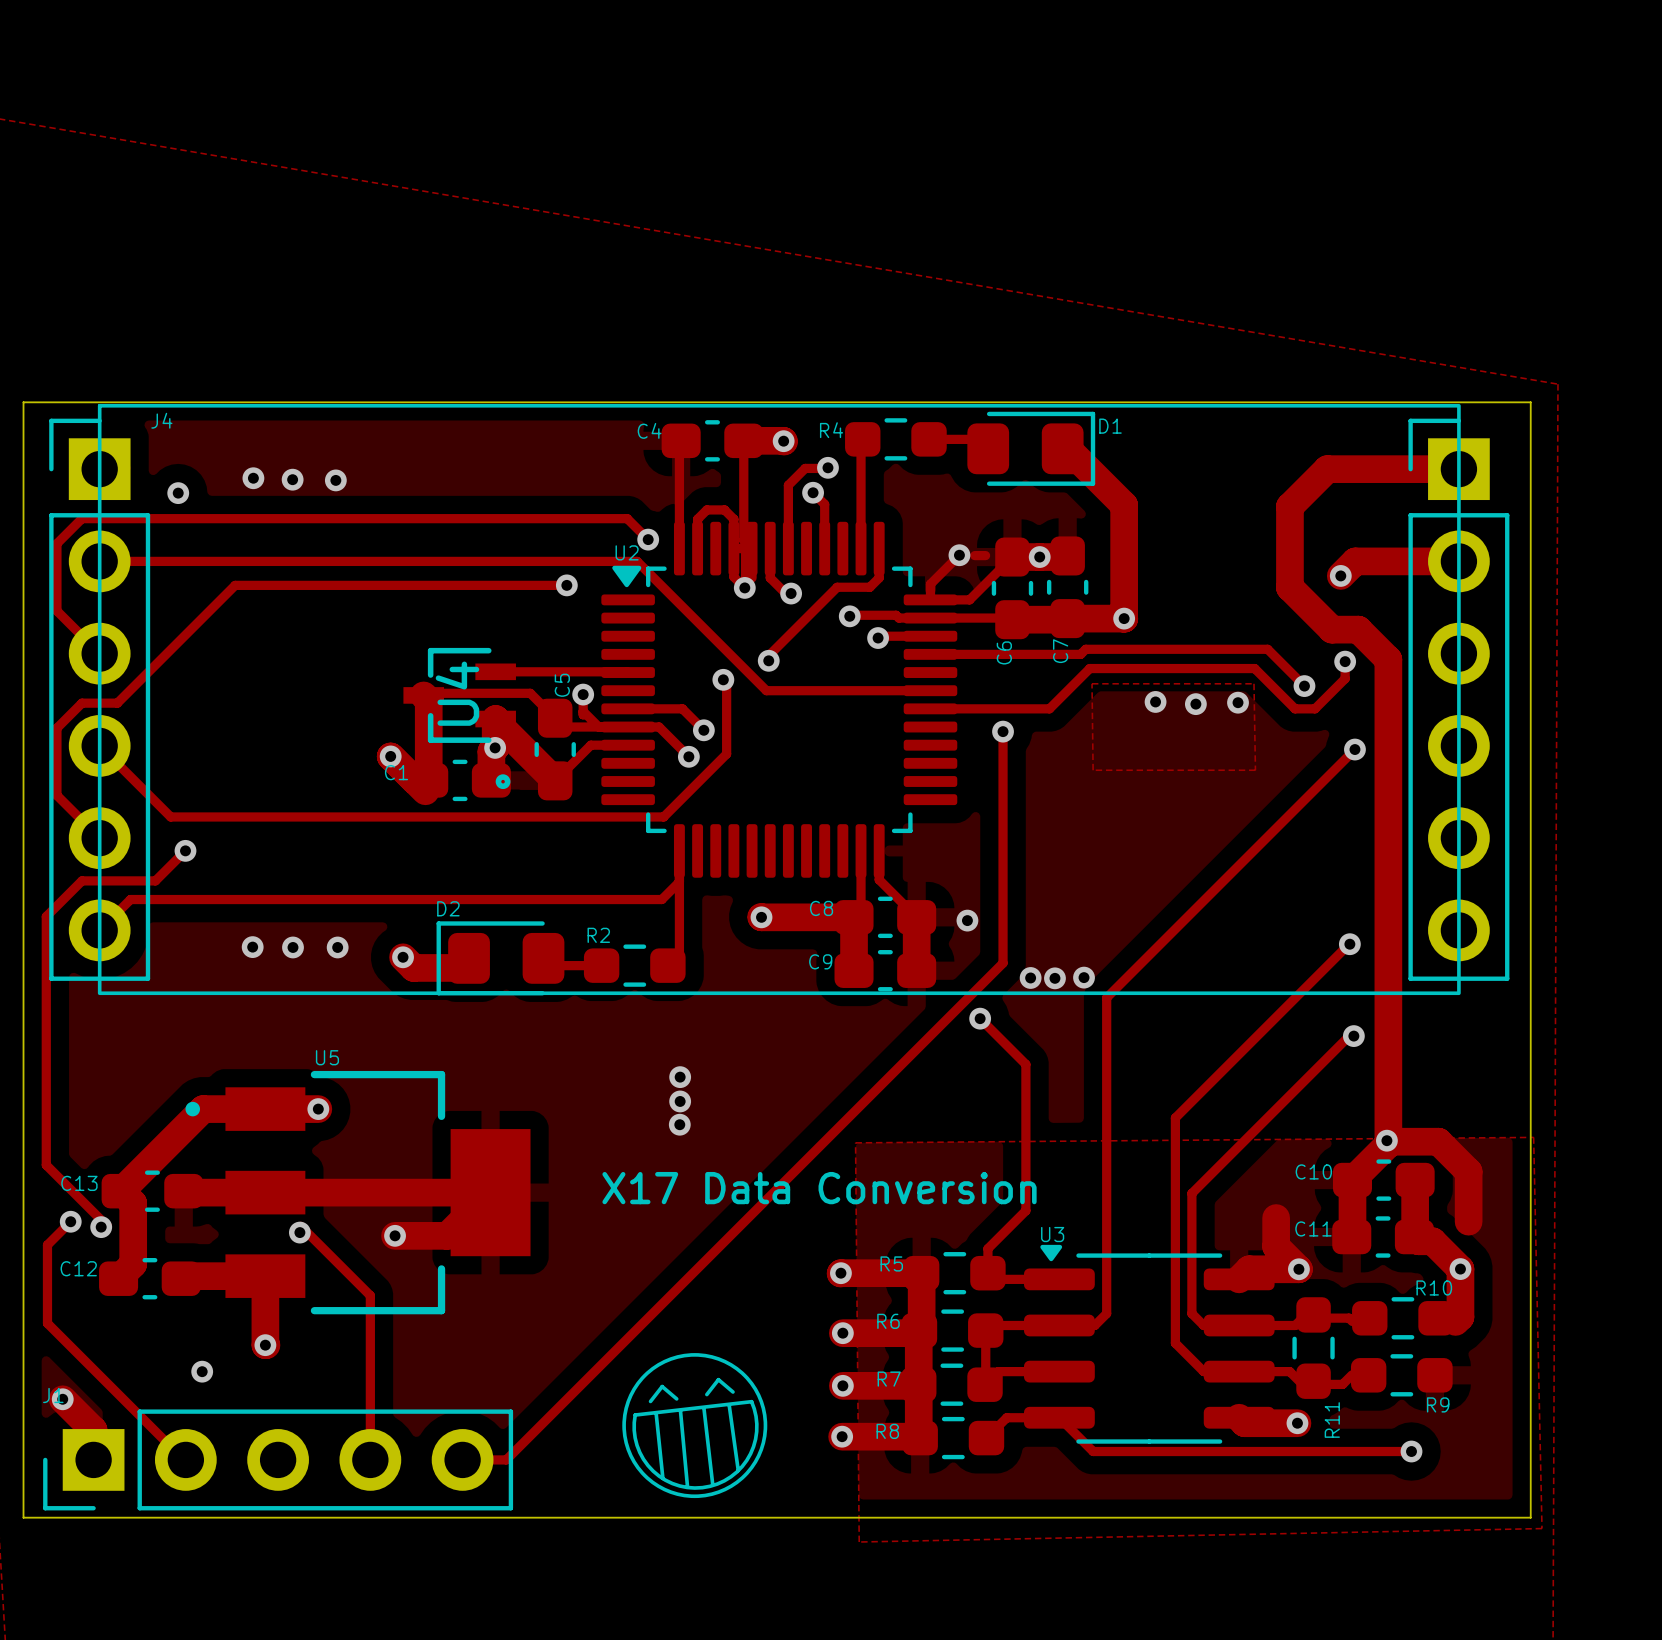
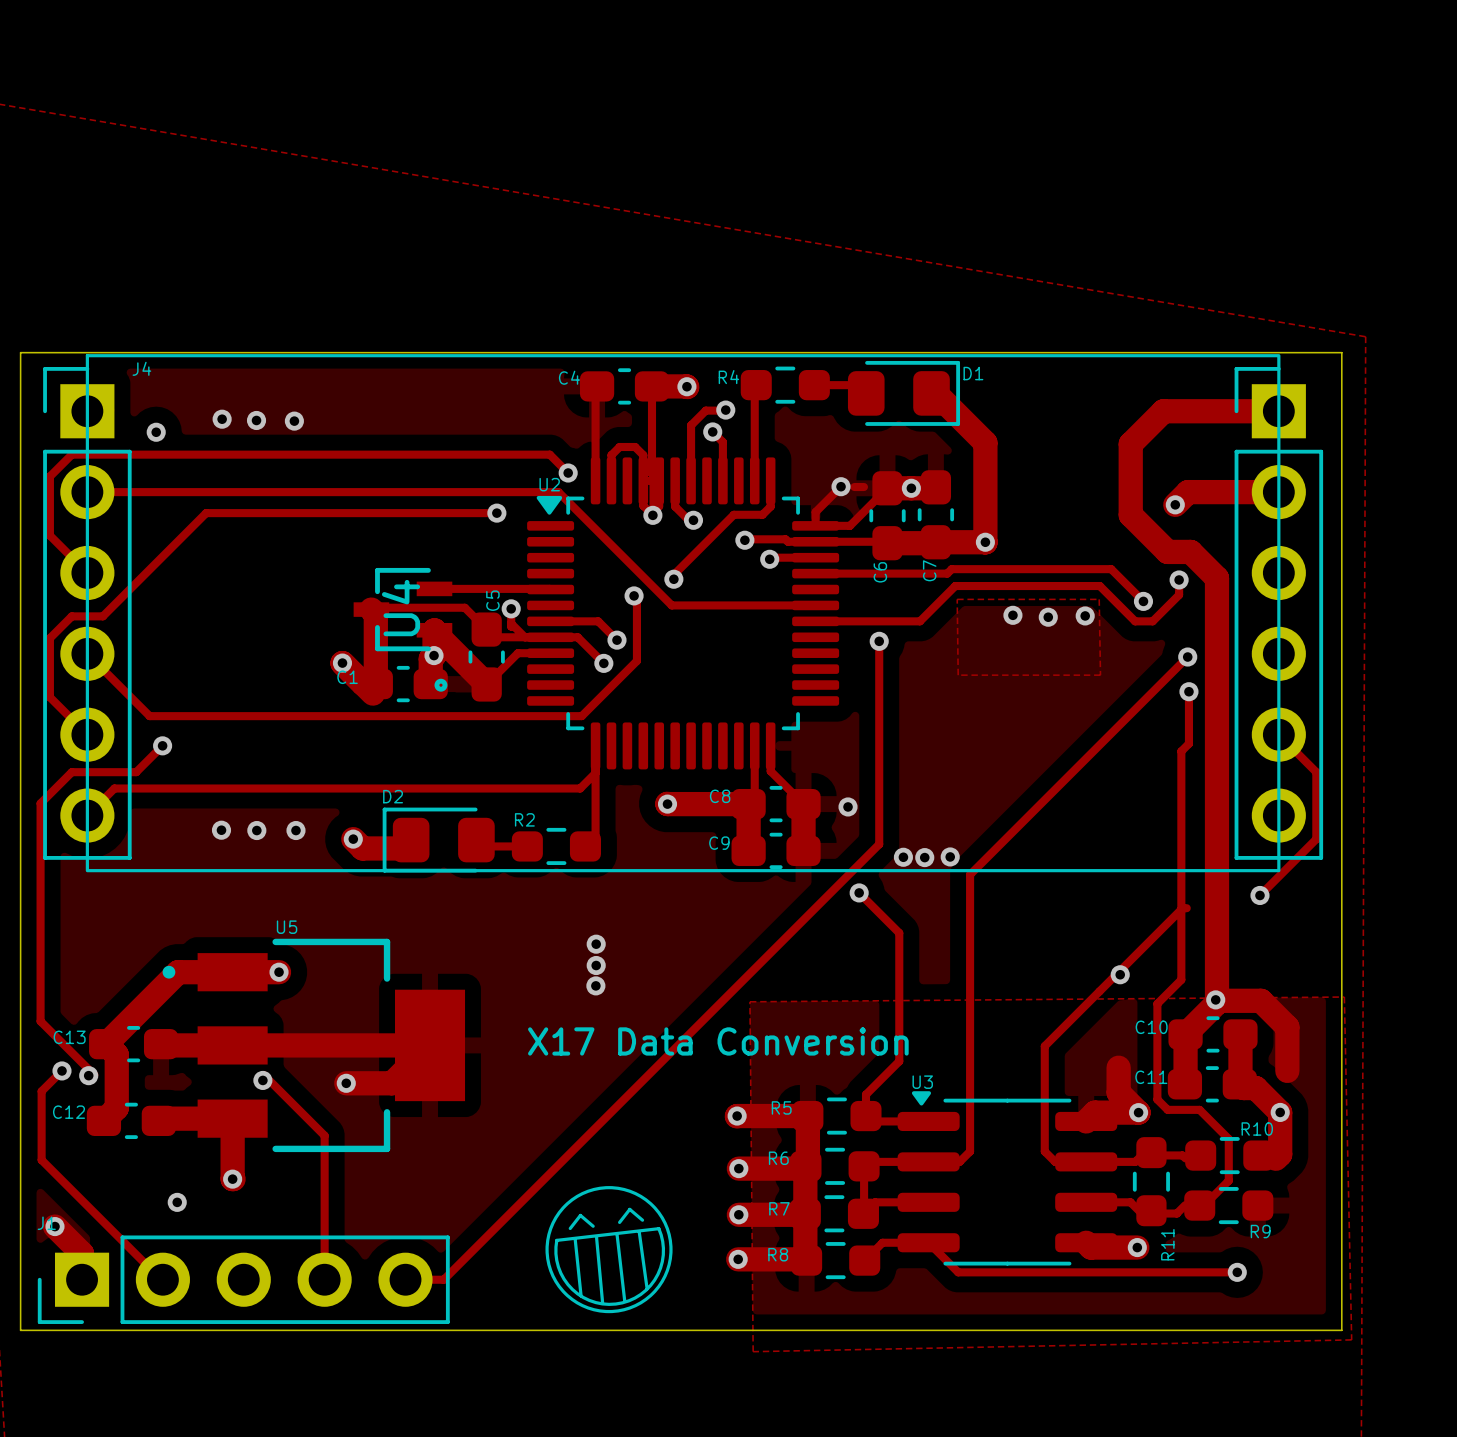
track: none -> (1188, 691) (1188, 743) (1181, 751) (1181, 979) (1157, 1003) (1157, 1099) (1167, 1109) (1199, 1109) (1228, 1139) (1228, 1180) (1203, 1205)
via: none -> (1188, 691)
track: none -> (1278, 734) (1316, 772) (1316, 839) (1259, 895)
track: (1349, 944) (1175, 1117) (1175, 1343) (1203, 1371) (1239, 1371) -> none
via: (1349, 944) -> none
via: none -> (1259, 895)
via: (1353, 1036) -> none
via: none -> (1120, 974)

